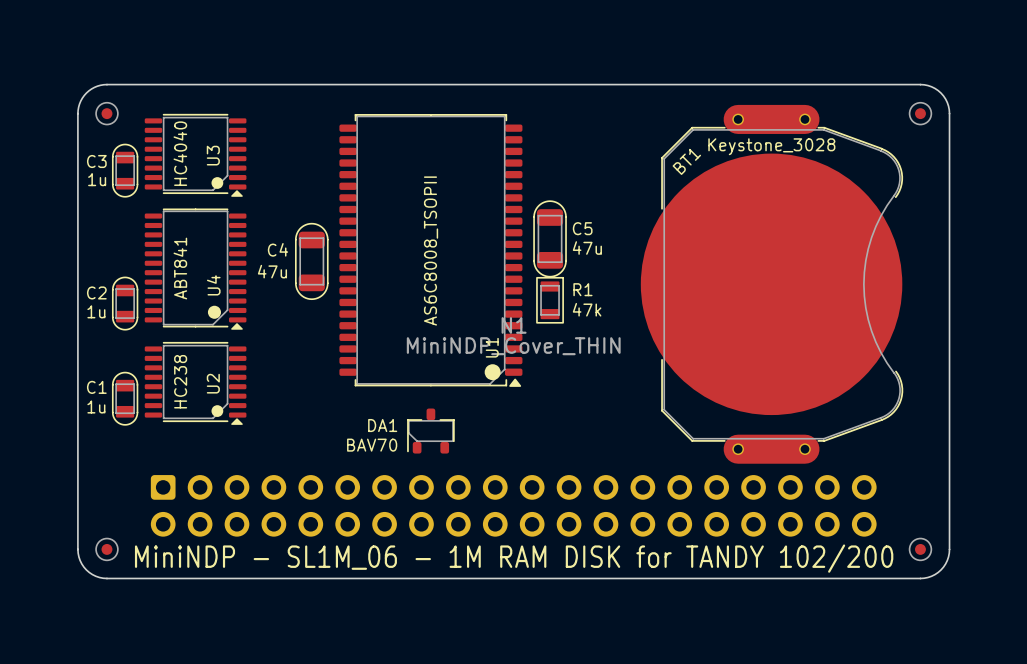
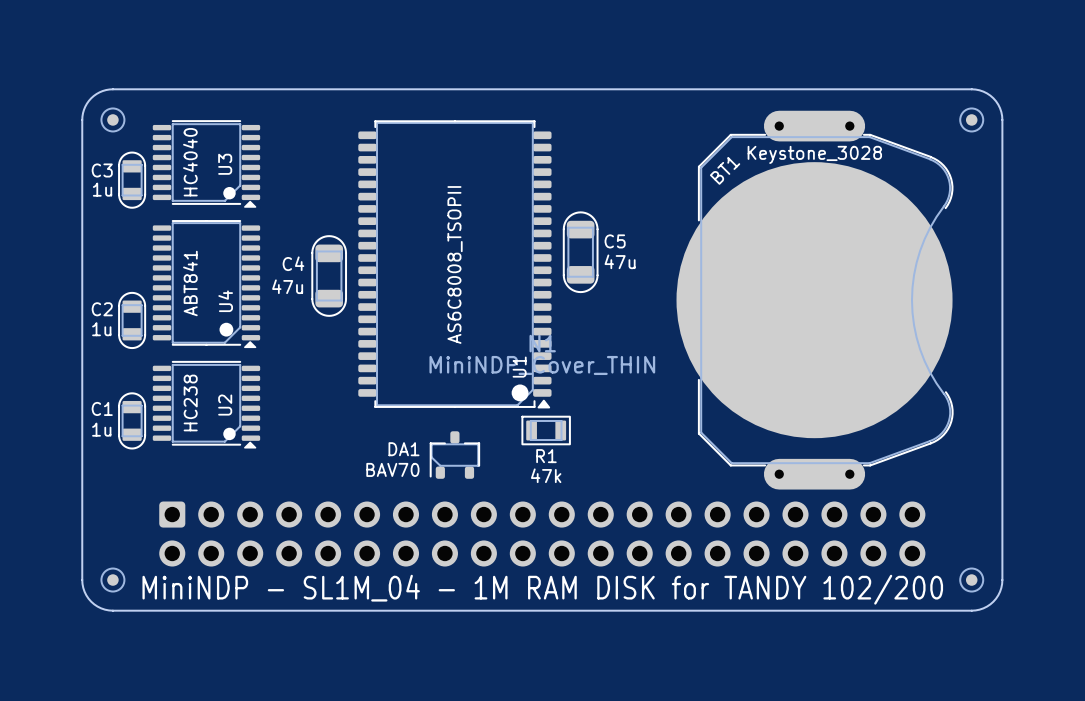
R1 rotation: 0° (550, 300) -> 90° clockwise (546, 430)
R1 position: (550, 300) -> (546, 430)
text: MiniNDP - SL1M_06 - 1M RAM DISK for TANDY 102/200 (514, 558) -> MiniNDP - SL1M_04 - 1M RAM DISK for TANDY 102/200 (542, 589)

